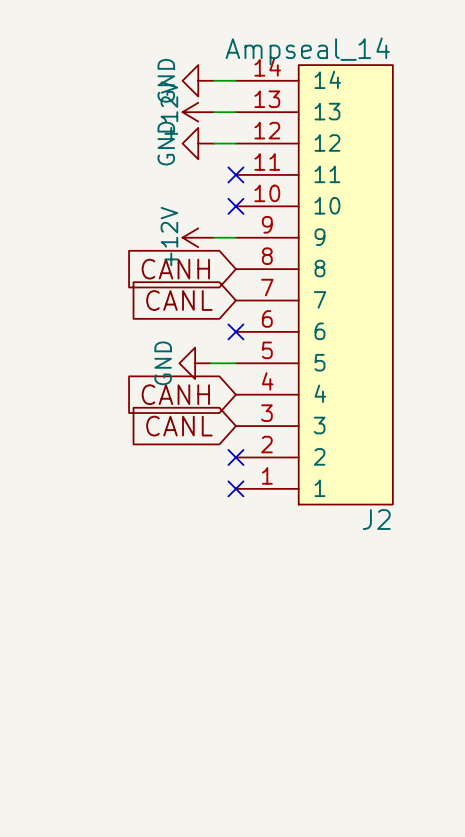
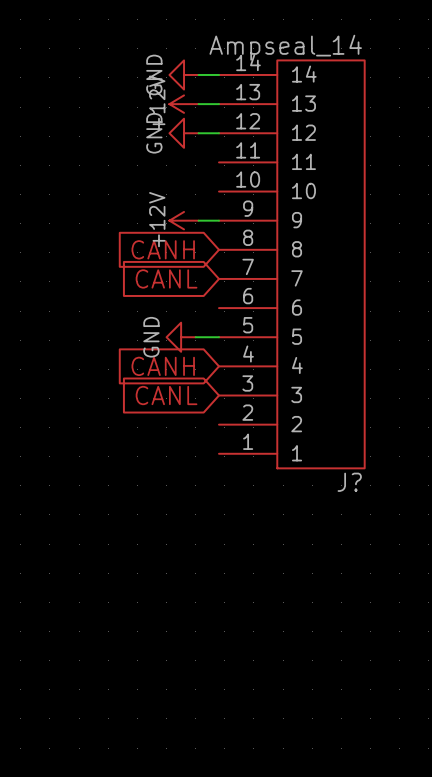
no-connect mark: (235, 174) -> none
no-connect mark: (235, 206) -> none
no-connect mark: (235, 331) -> none
no-connect mark: (235, 457) -> none
no-connect mark: (235, 488) -> none
J2 name: J2 (376, 519) -> J? (349, 482)

